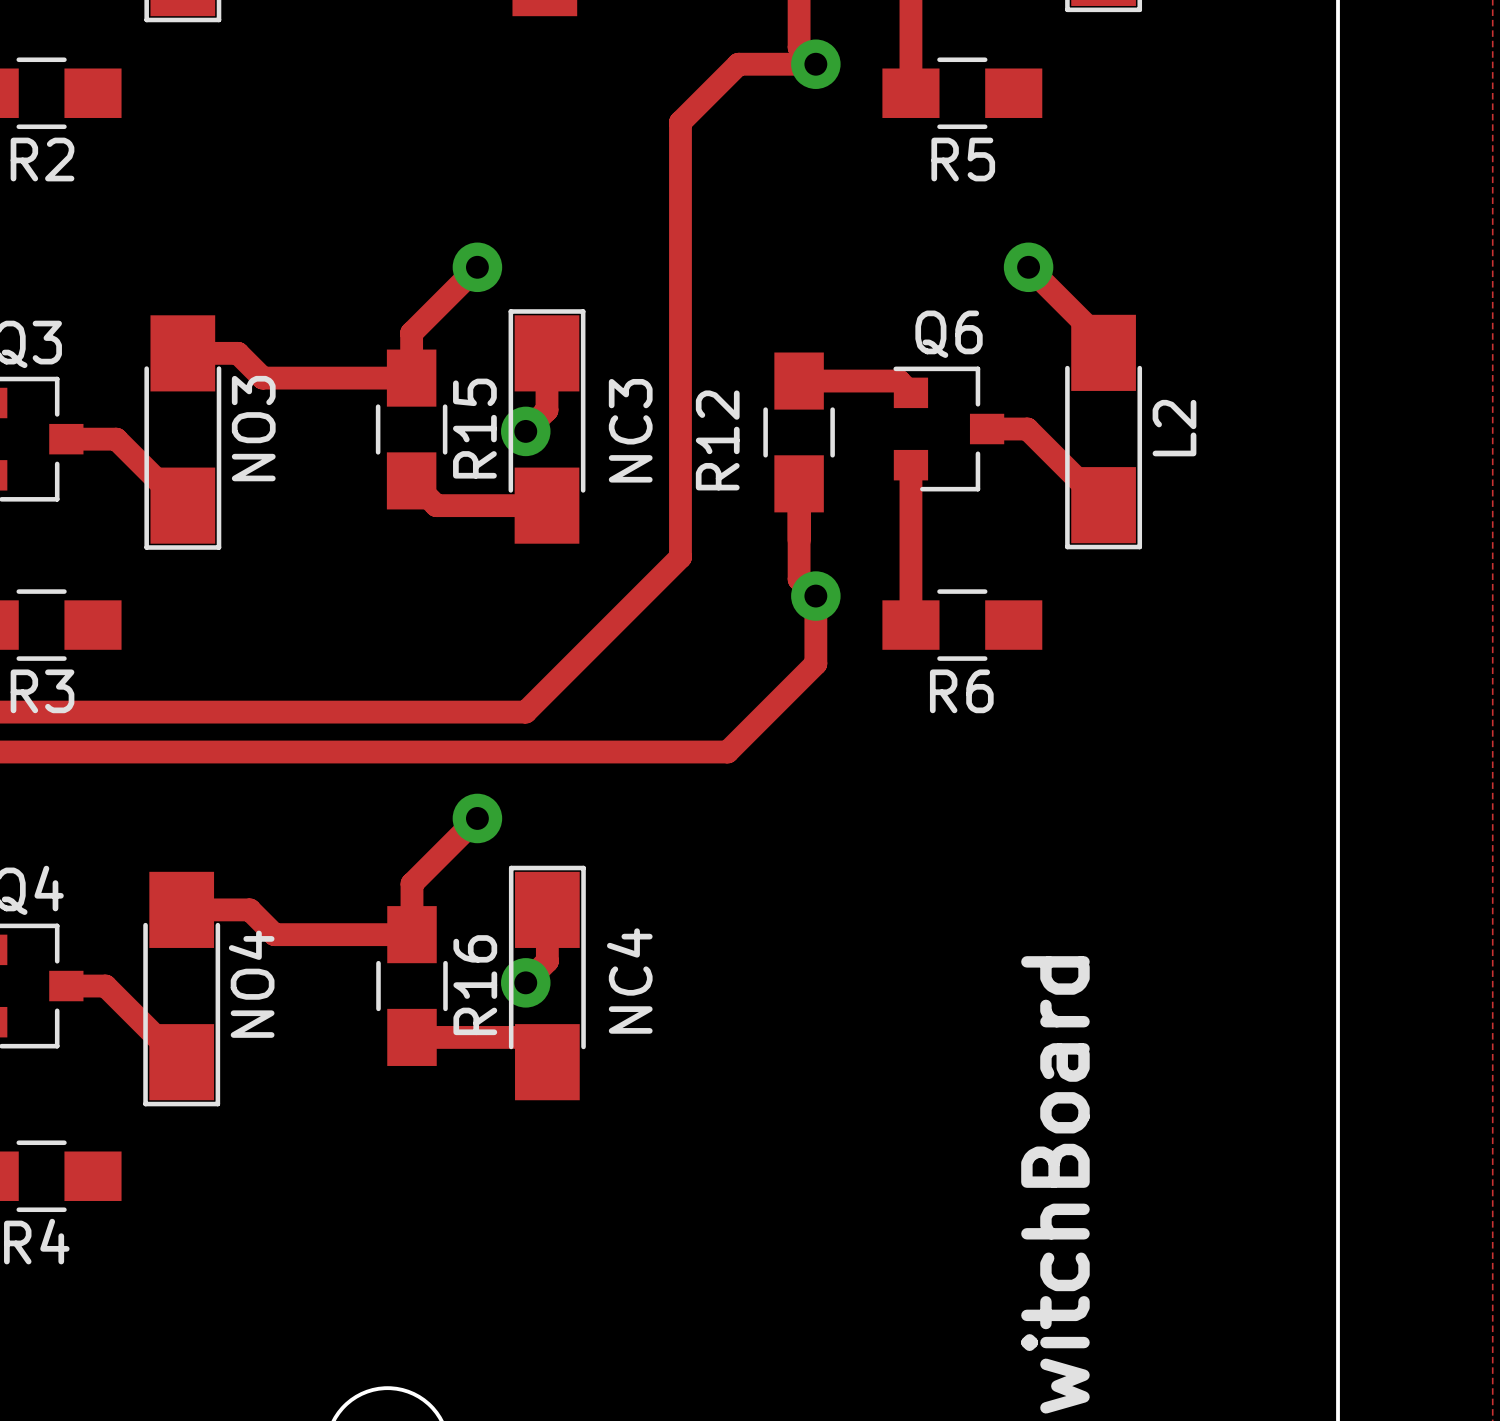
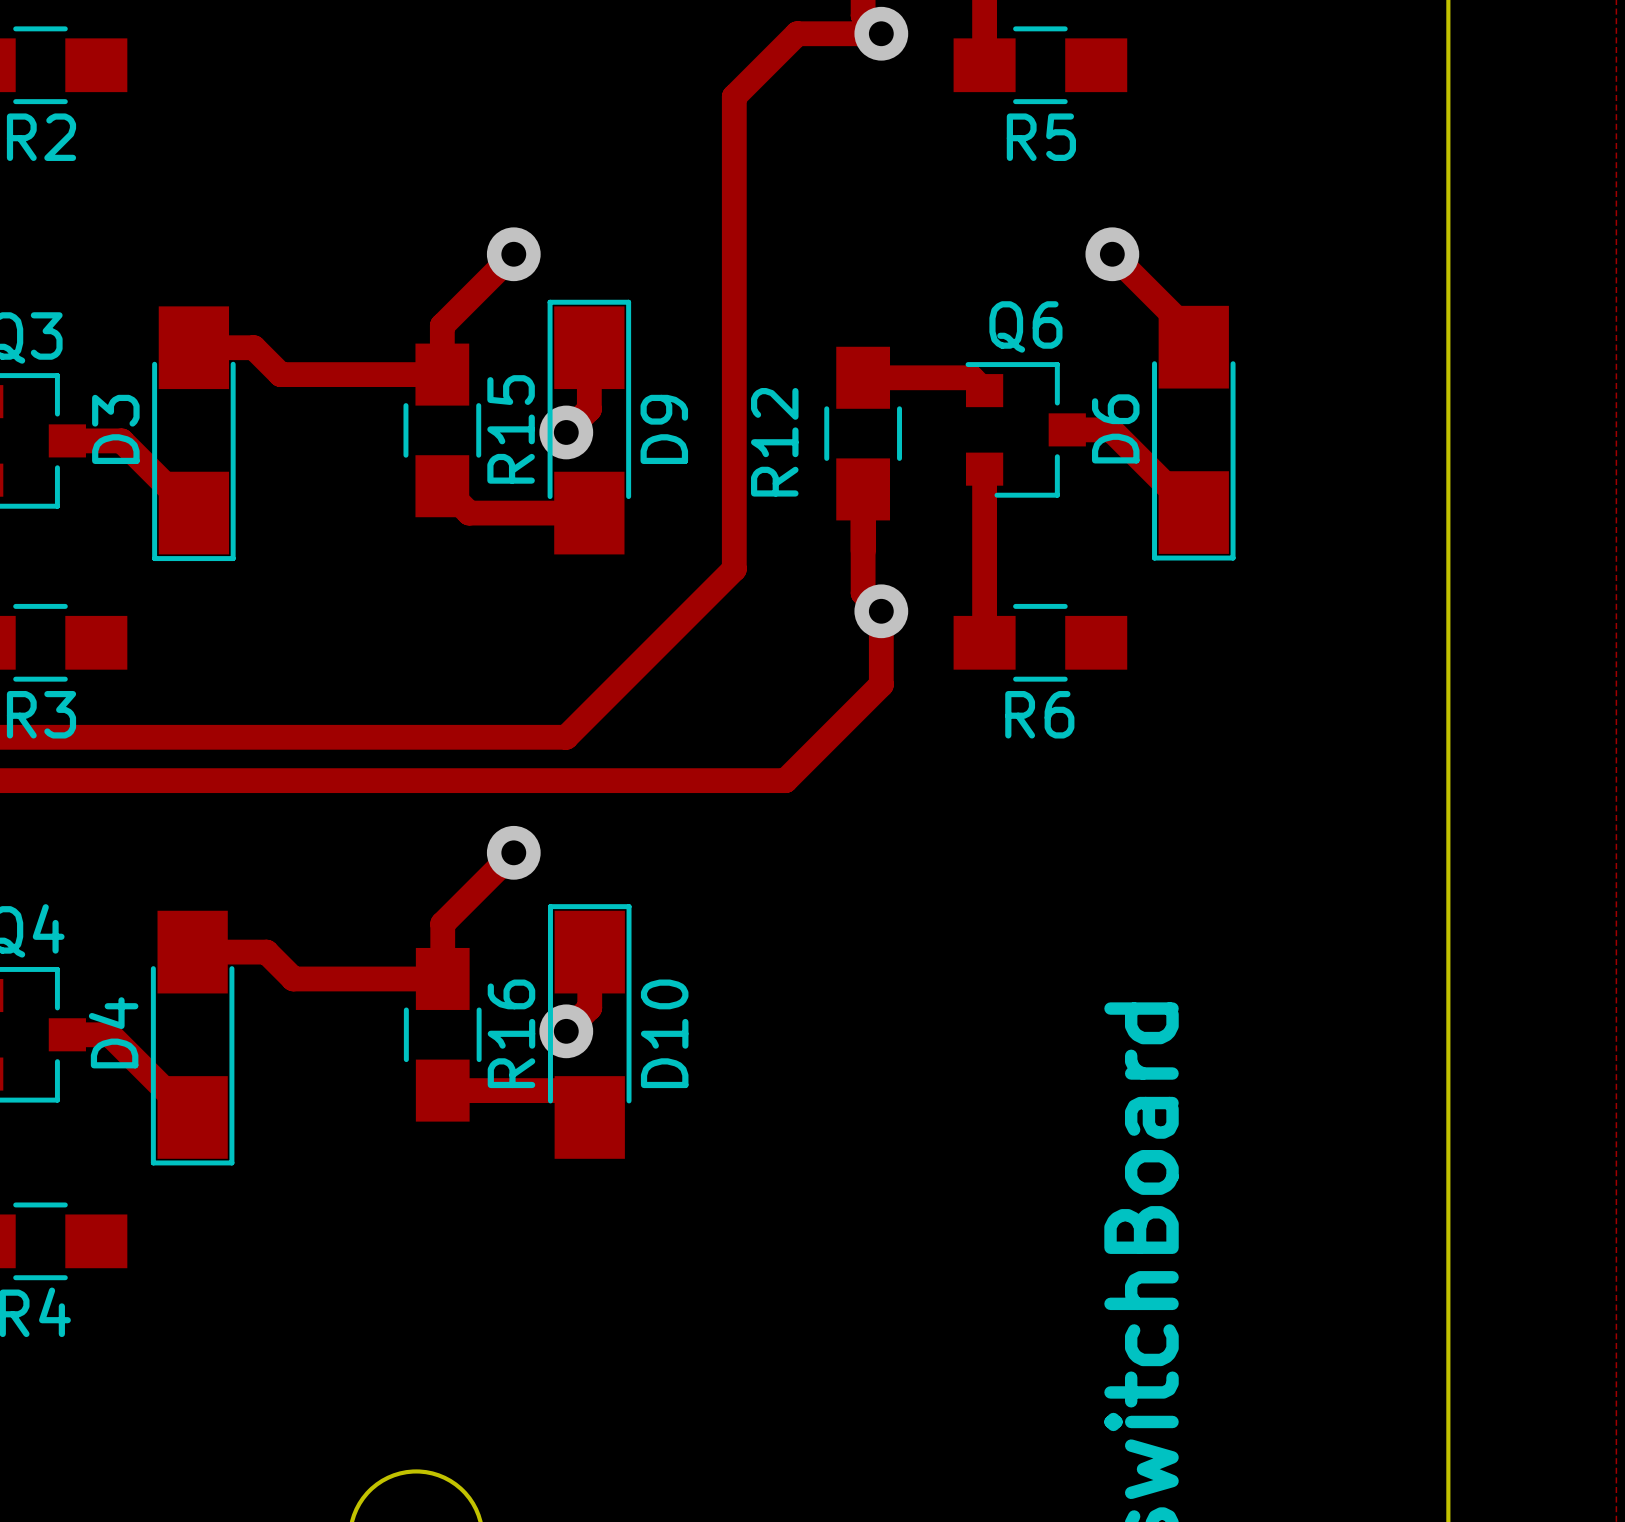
D3 name: none -> D3 (115, 429)
D3 value: NO3 (253, 428) -> none
D9 name: none -> D9 (664, 429)
D6 name: none -> D6 (1115, 428)
D6 value: L2 (1174, 428) -> none
D9 value: NC3 (630, 430) -> none
D10 value: NC4 (629, 981) -> none
D4 name: none -> D4 (113, 1032)
D4 value: NO4 (251, 984) -> none
D10 name: none -> D10 (664, 1033)

